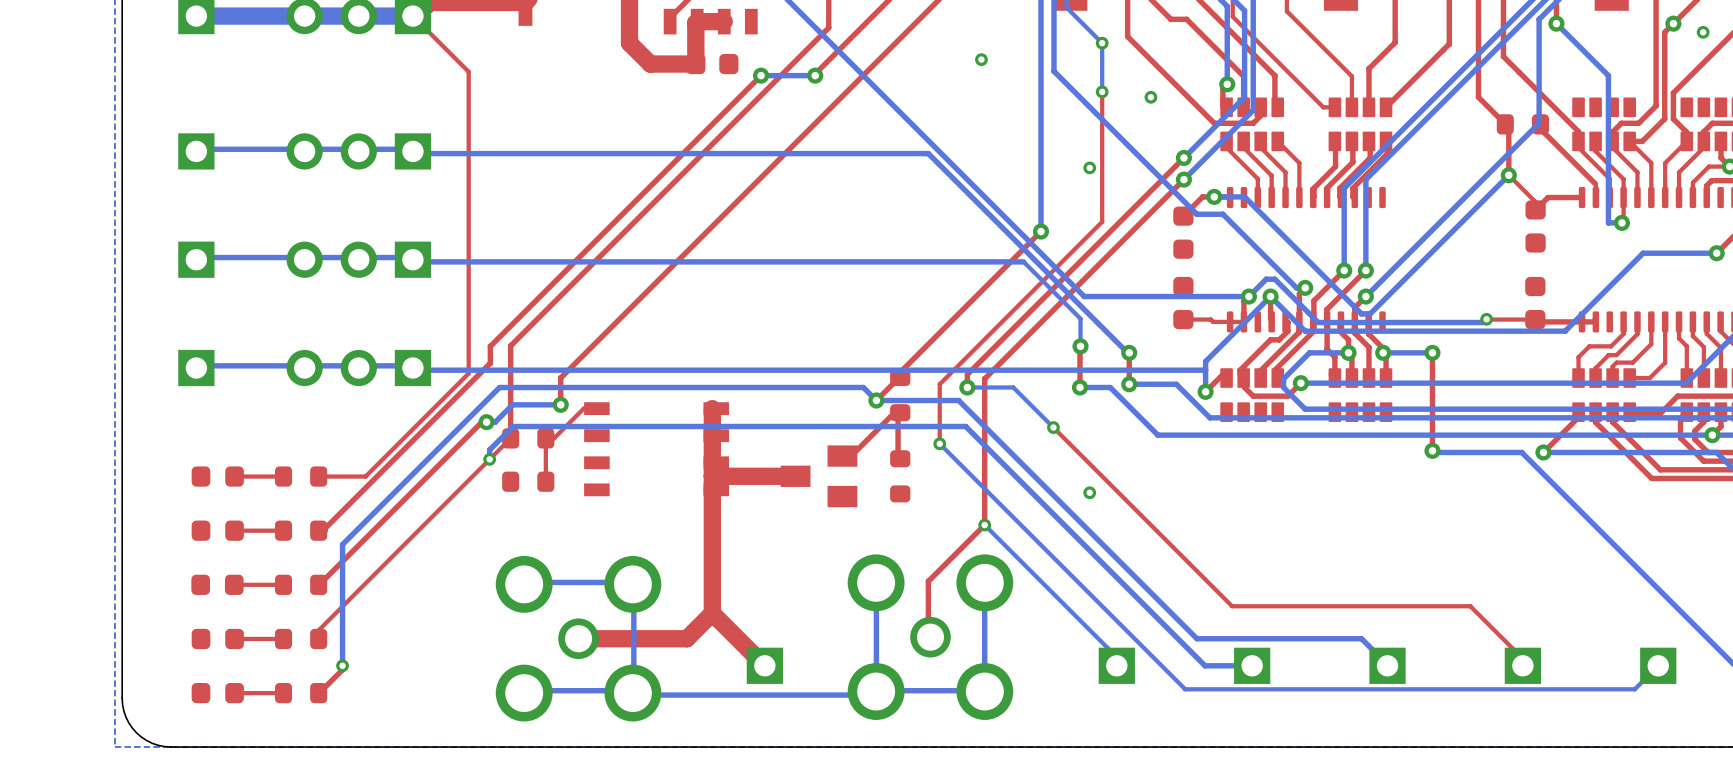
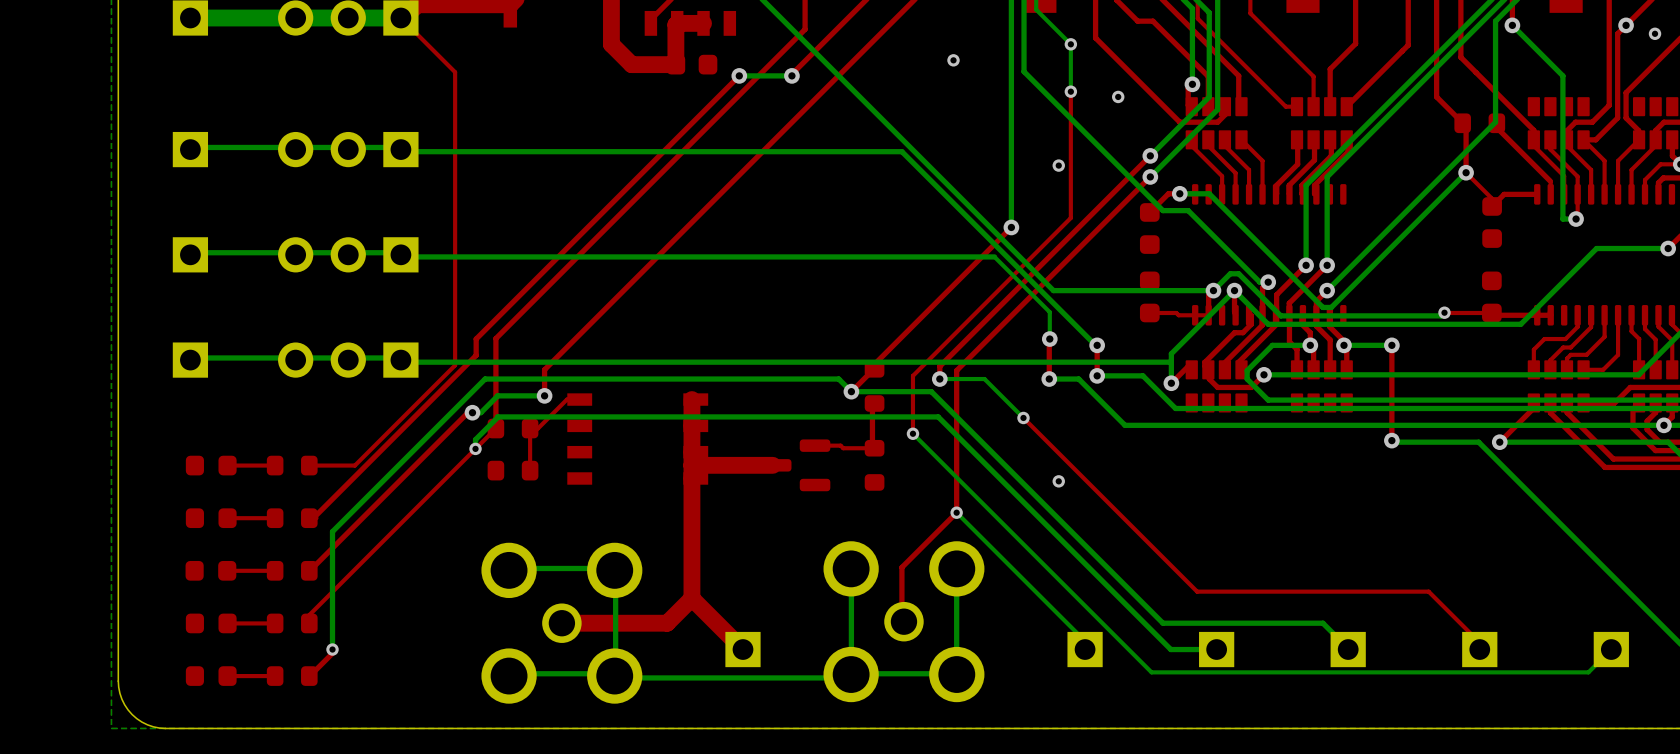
top track: (898, 409) (850, 456) -> none
part footprint: [780, 445, 858, 508] -> [760, 439, 831, 492]
top track: none -> (815, 445) (874, 448)

